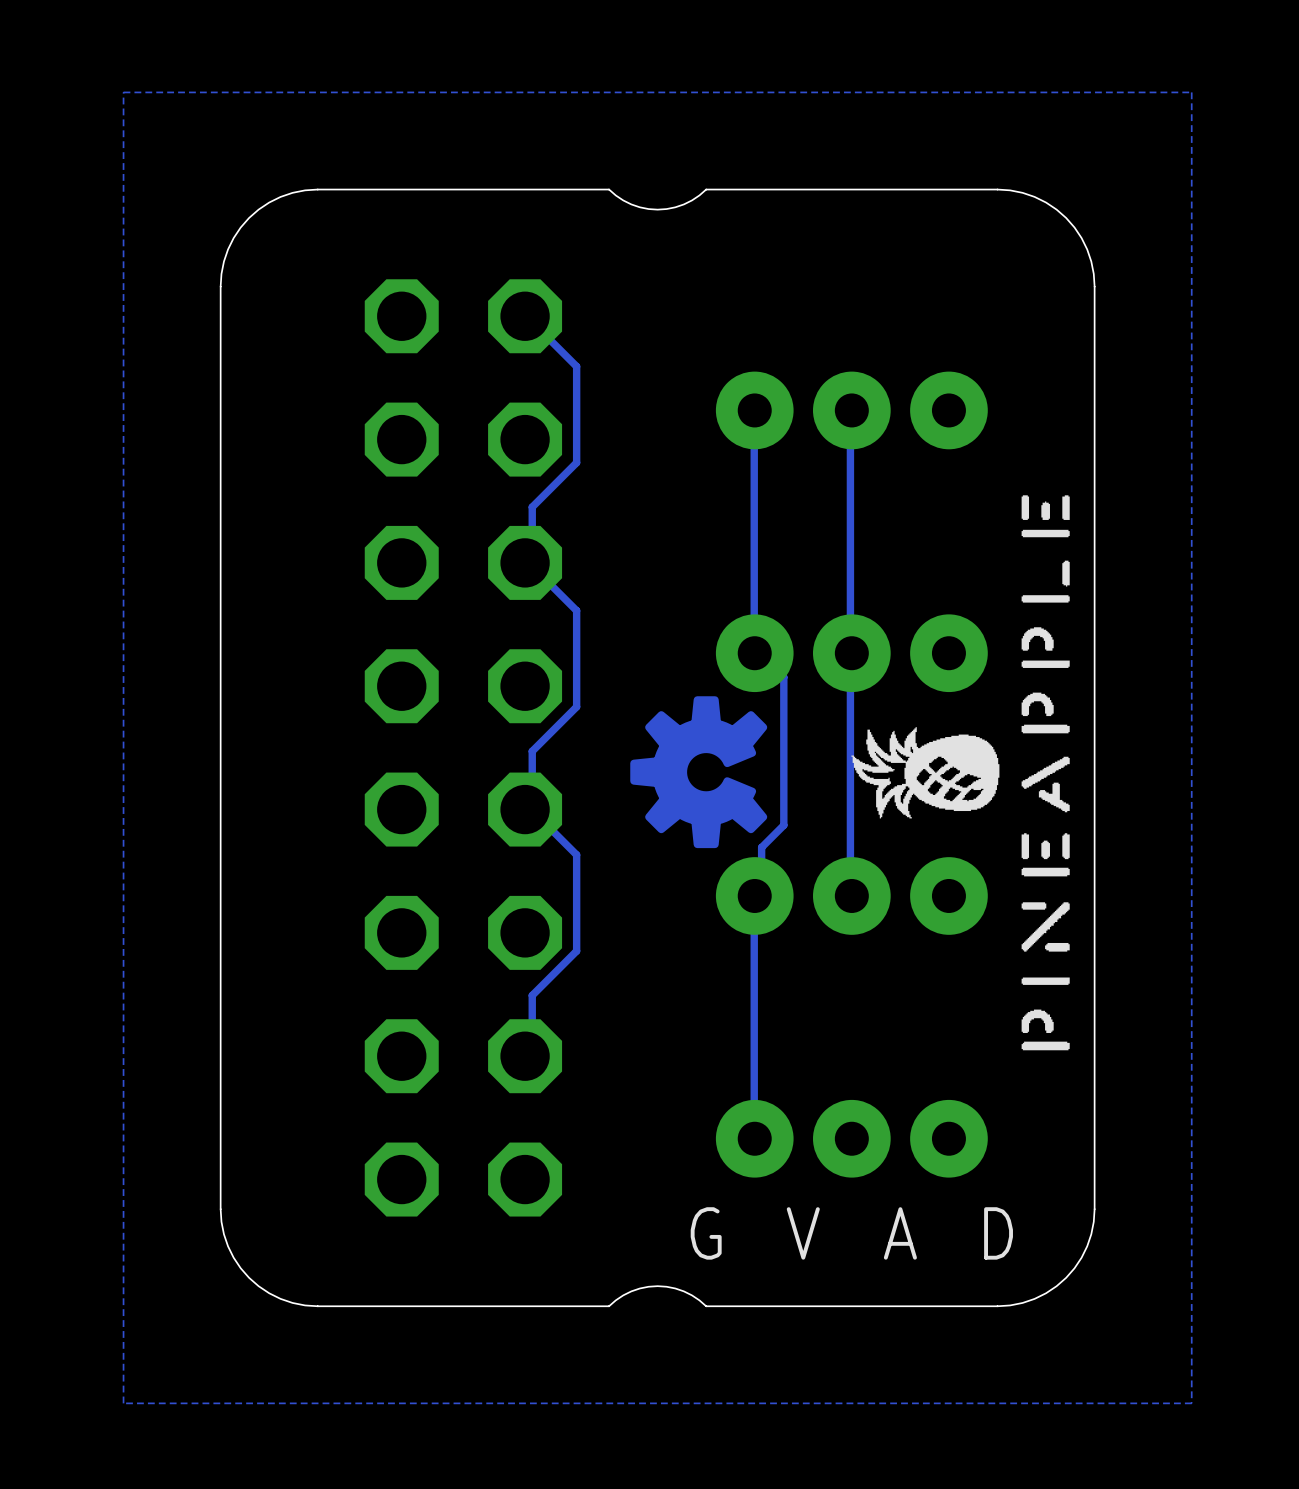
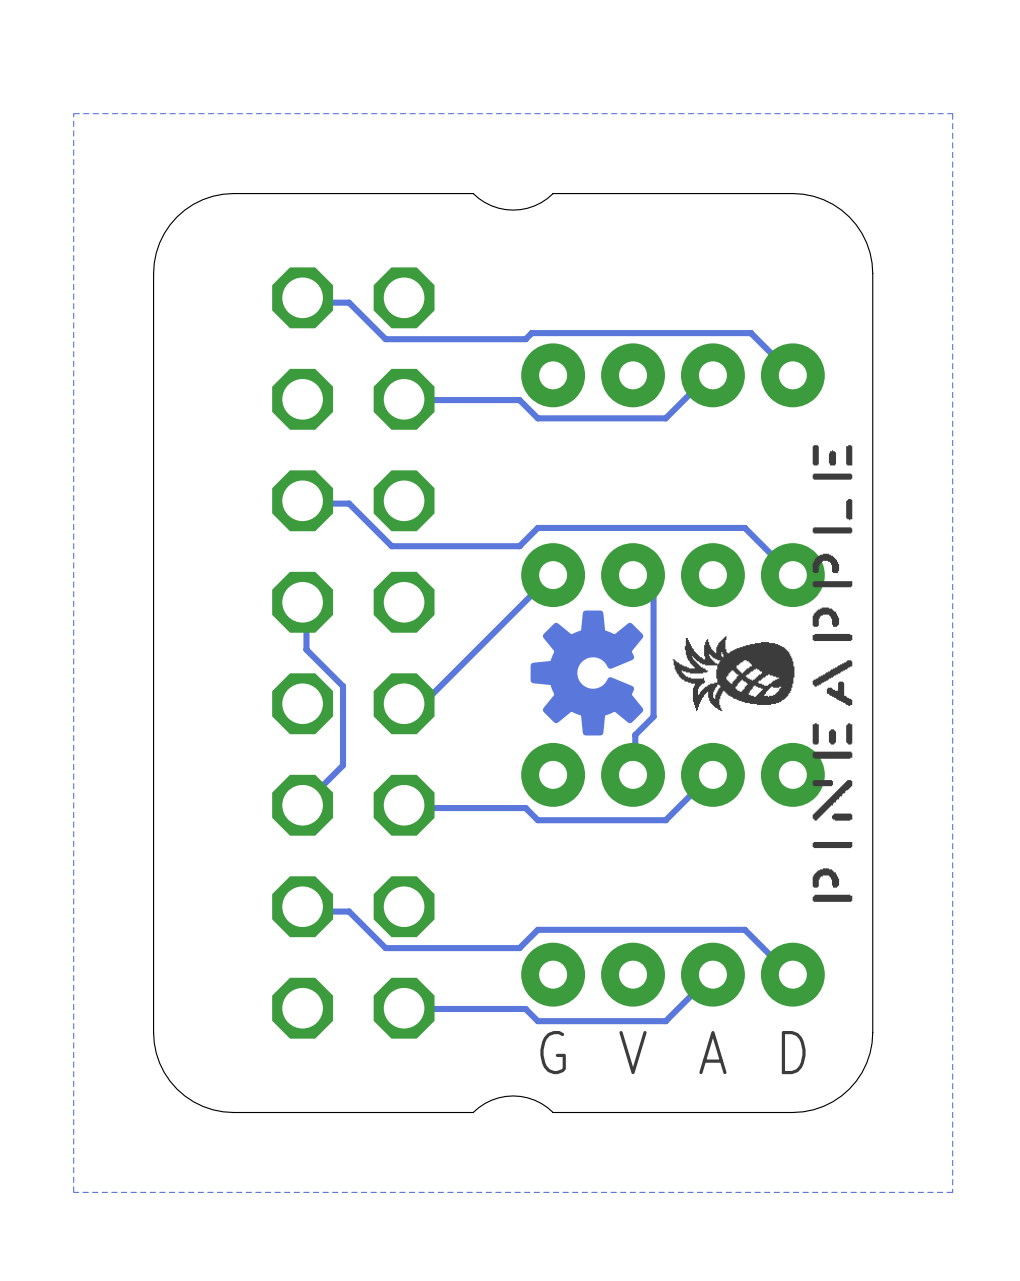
track: none -> (302, 297) (306, 302) (349, 302) (385, 339) (525, 339) (531, 333) (750, 333) (792, 375)
track: (525, 316) (576, 366) (576, 462) (532, 507) (532, 558) (525, 562) (532, 566) (576, 610) (576, 706) (532, 751) (532, 803) -> (553, 575) (428, 698) (409, 698)
part footprint: [715, 371, 988, 450] -> [521, 343, 825, 408]
track: (754, 410) (754, 653) (761, 655) (783, 677) (783, 825) (761, 847) (761, 891) (754, 895) (754, 899) (754, 1138) -> none
track: (851, 410) (851, 895) -> none
track: none -> (712, 375) (708, 375) (665, 418) (537, 418) (519, 400) (404, 399)
track: none -> (302, 500) (306, 503) (349, 503) (391, 546) (519, 546) (537, 527) (744, 527) (792, 575)
part footprint: [715, 614, 988, 693] -> [521, 543, 825, 608]
track: none -> (633, 575) (653, 594) (653, 716) (635, 734) (635, 771) (633, 774)
track: none -> (302, 602) (306, 607) (306, 649) (343, 686) (343, 765) (302, 805)
drawing position: (698, 772) -> (586, 673)
track: (525, 809) (532, 810) (576, 854) (576, 951) (532, 995) (532, 1054) (525, 1056) -> none
part footprint: [715, 857, 988, 935] -> [521, 742, 825, 807]
track: none -> (712, 774) (665, 820) (537, 820) (525, 808) (409, 808) (404, 805)
track: none -> (302, 906) (306, 911) (349, 911) (385, 948) (519, 948) (537, 929) (744, 929) (787, 972) (792, 974)
part footprint: [715, 1099, 988, 1178] -> [521, 942, 825, 1007]
track: none -> (712, 974) (665, 1021) (537, 1021) (525, 1008) (404, 1008)

